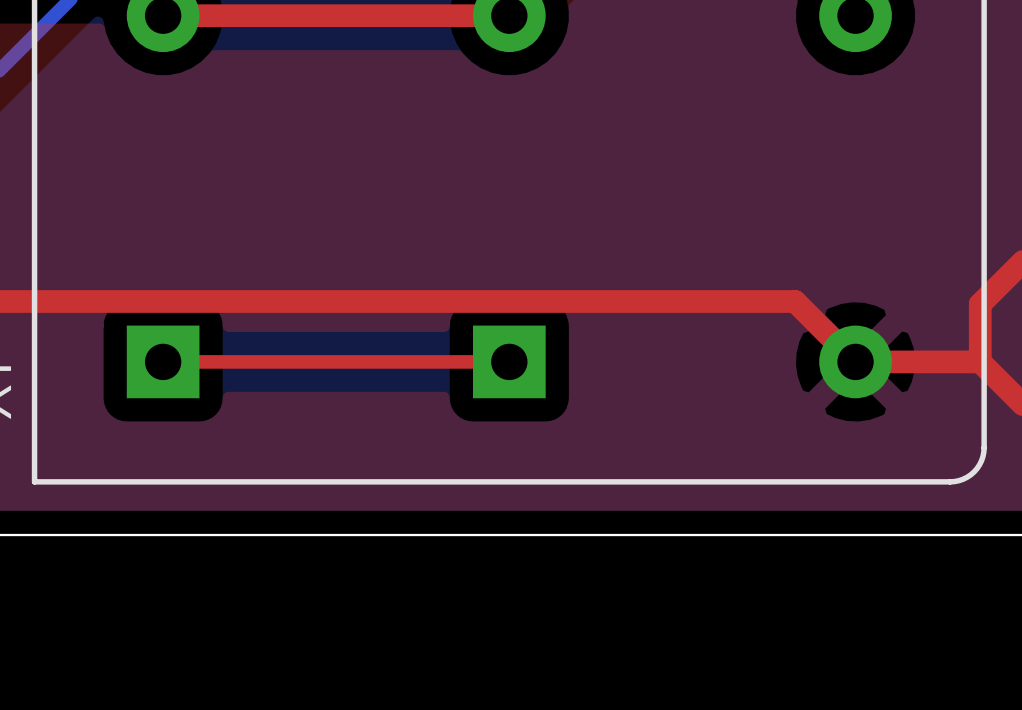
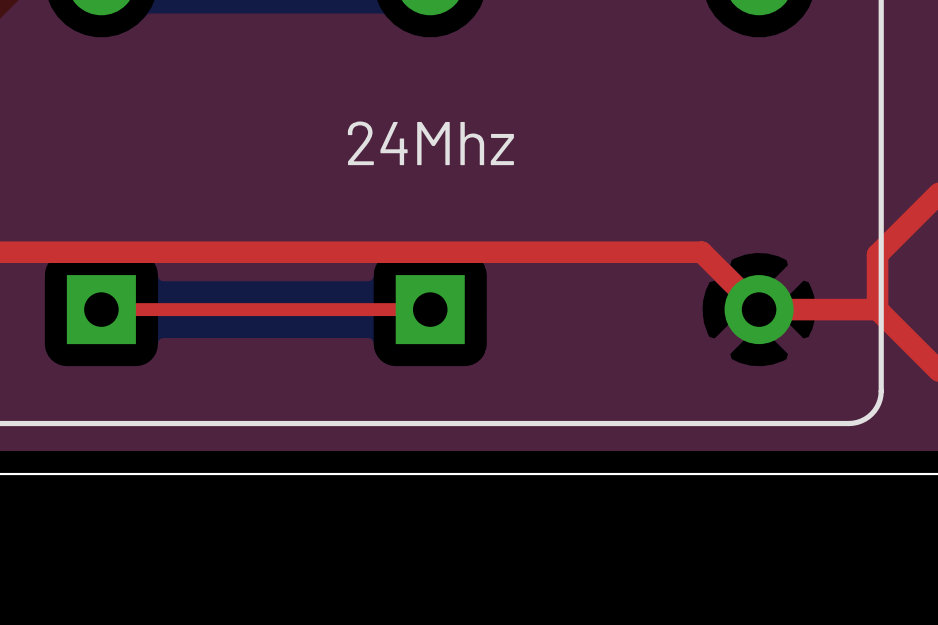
text: none -> 24Mhz (430, 143)

